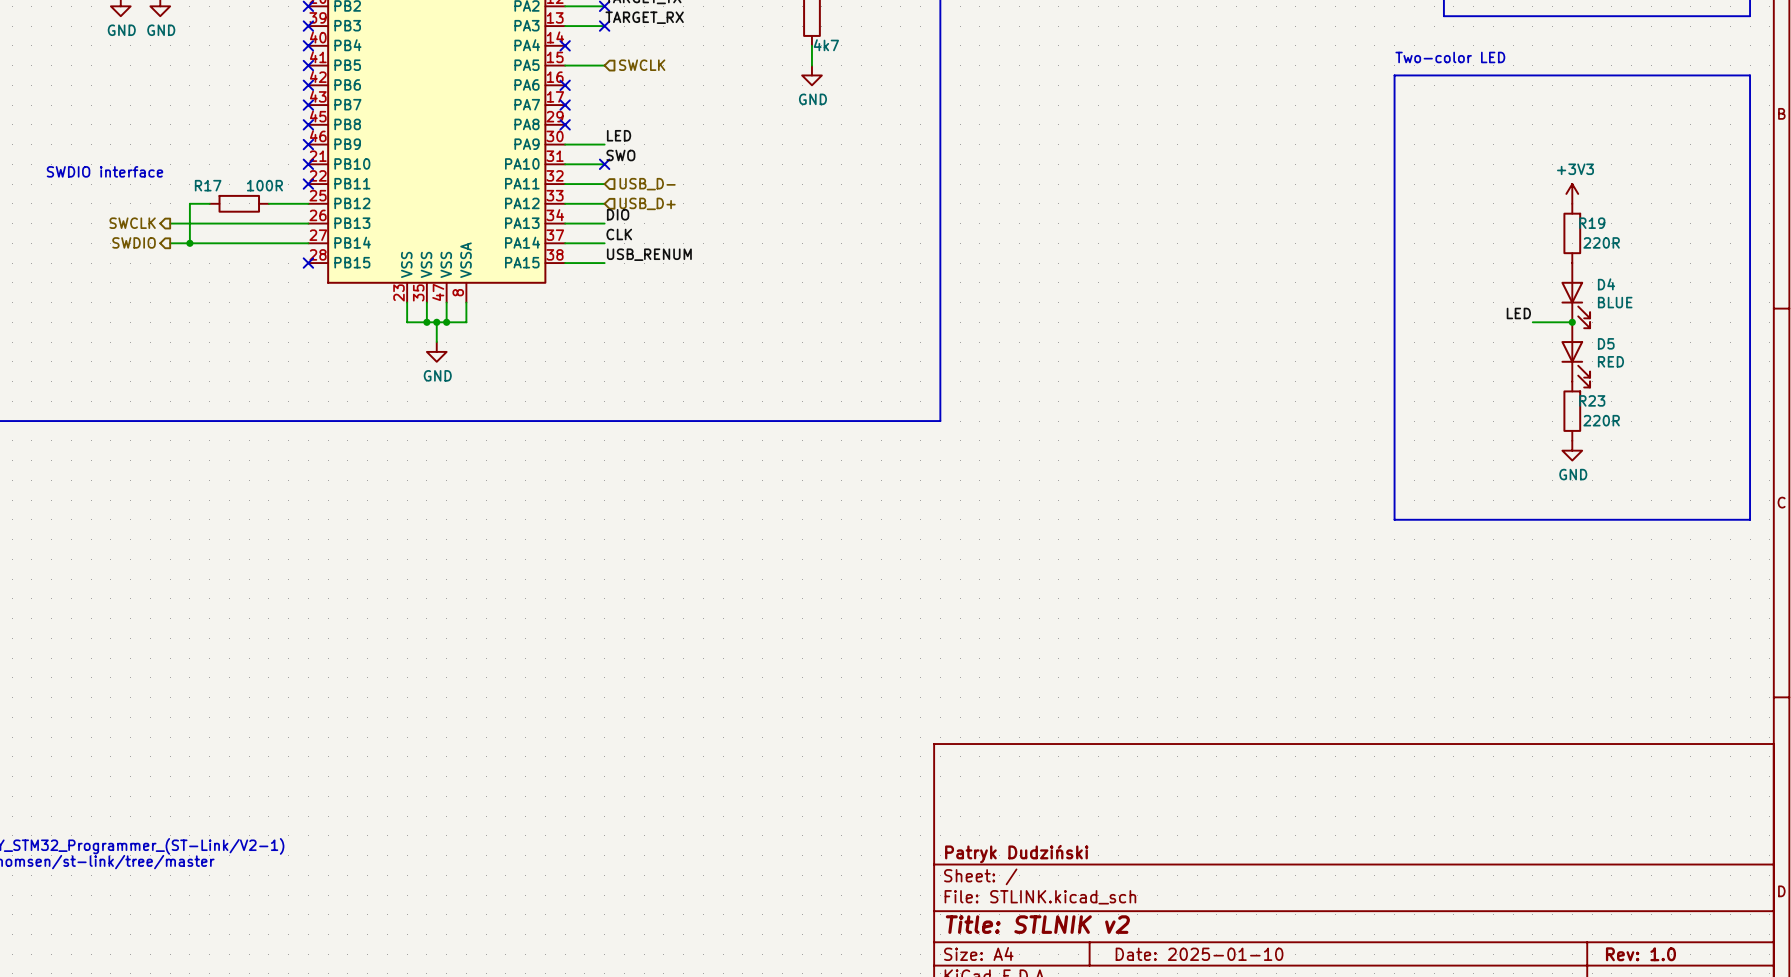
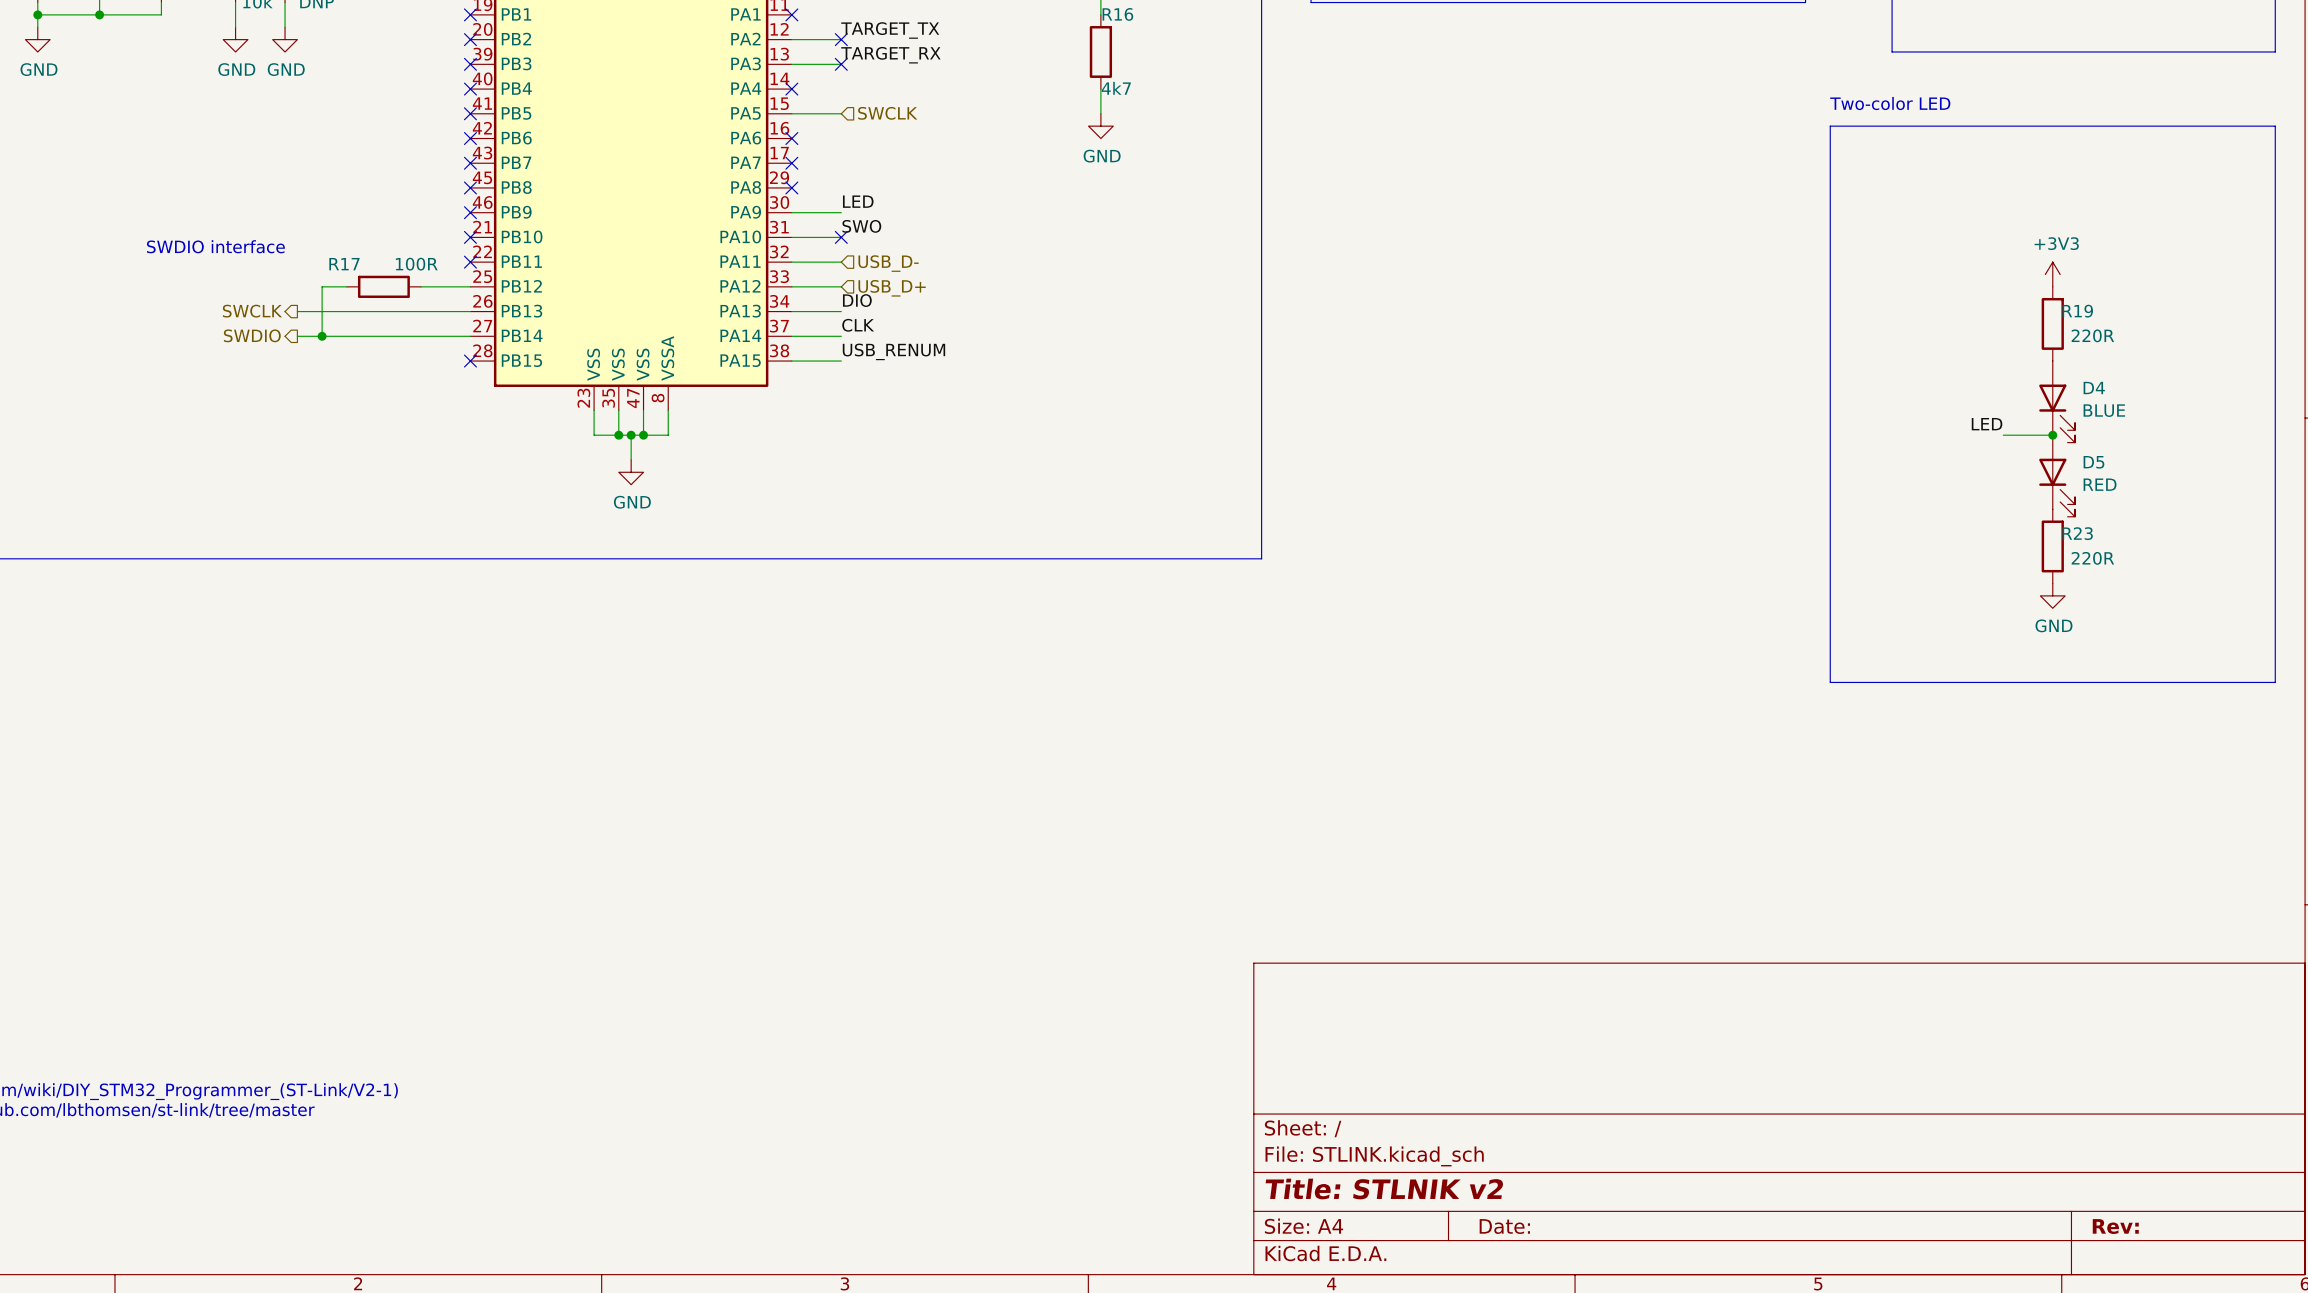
title block: Patryk Dudziński (1016, 854) -> none
title block: Date: 2025-01-10 (1199, 954) -> Date: (1504, 1226)
title block: Rev: 1.0 (1640, 954) -> Rev: (2115, 1226)

